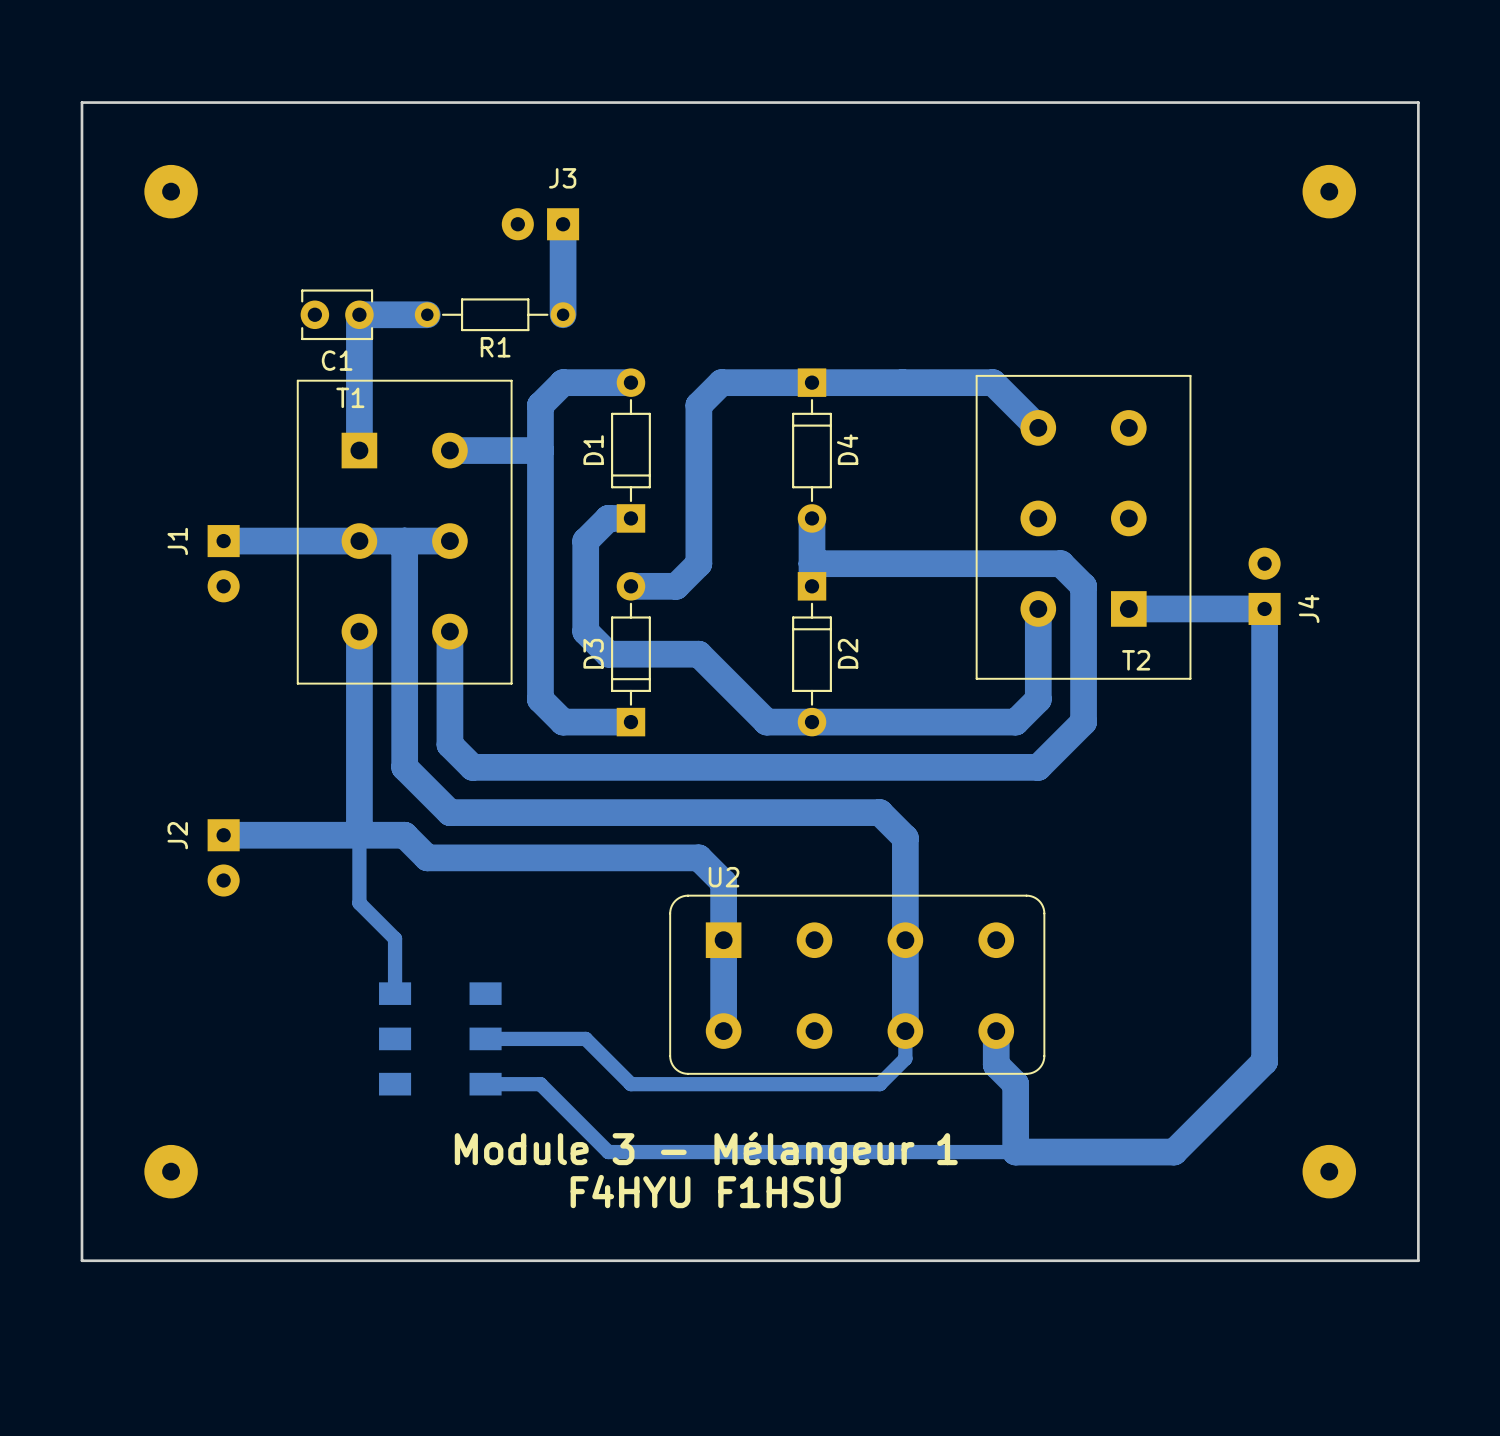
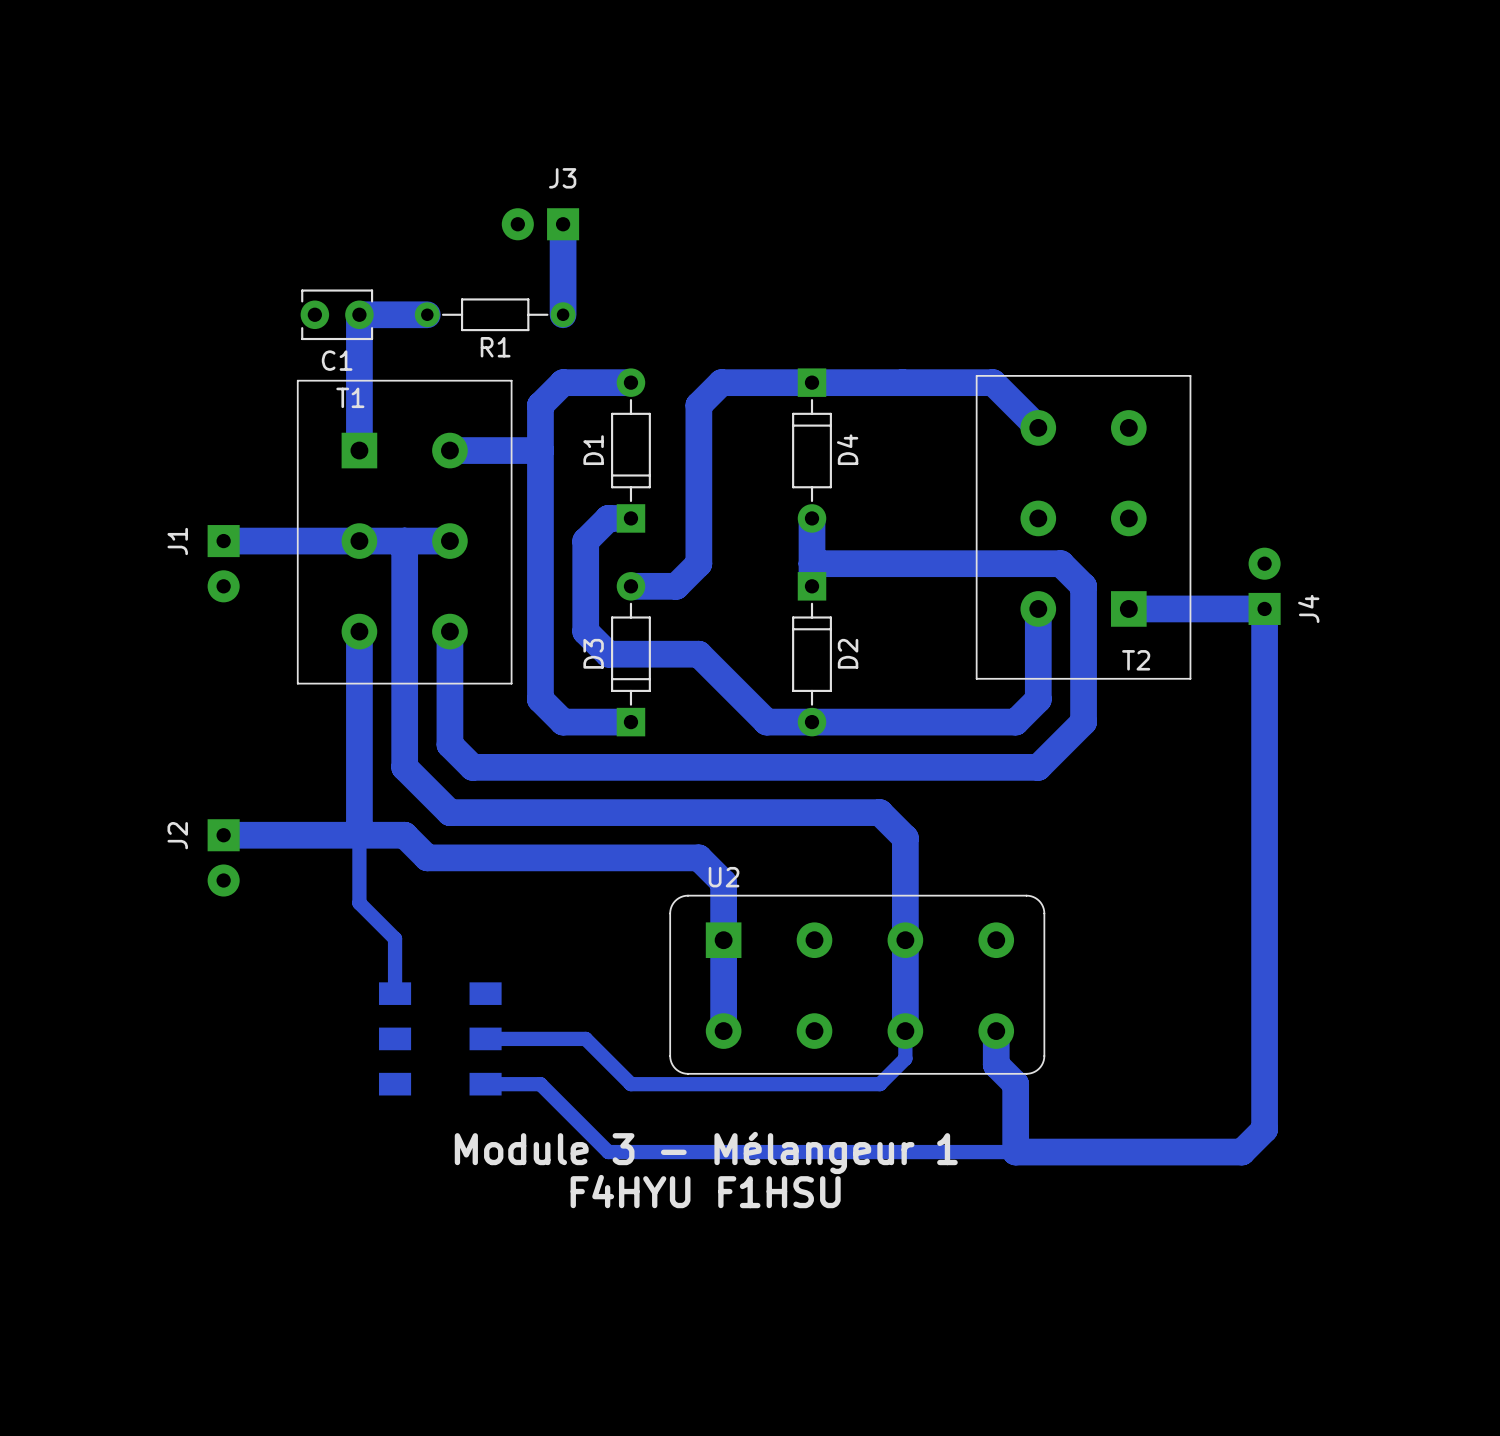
board edge: (81, 102) (81, 1260) (1418, 1260) (1418, 102) (81, 102) -> none
part: (171, 191) -> none
part: (1329, 191) -> none
bottom track: (1264, 1061) (1174, 1152) -> (1264, 1061) (1264, 1129) (1241, 1152) (1174, 1152)
part: (171, 1171) -> none
part: (1329, 1171) -> none

